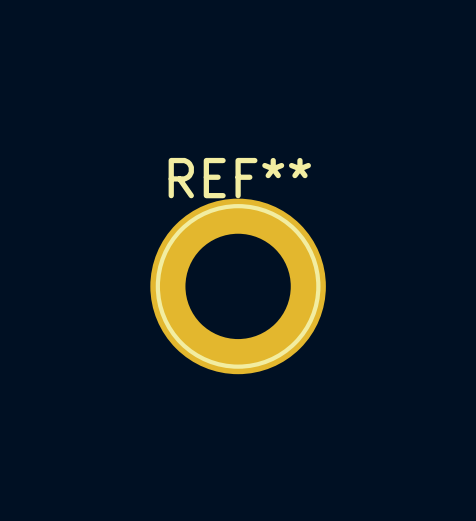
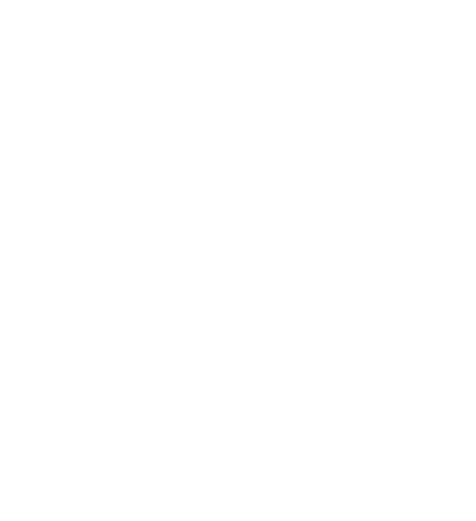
REF**: (238, 286) -> none

